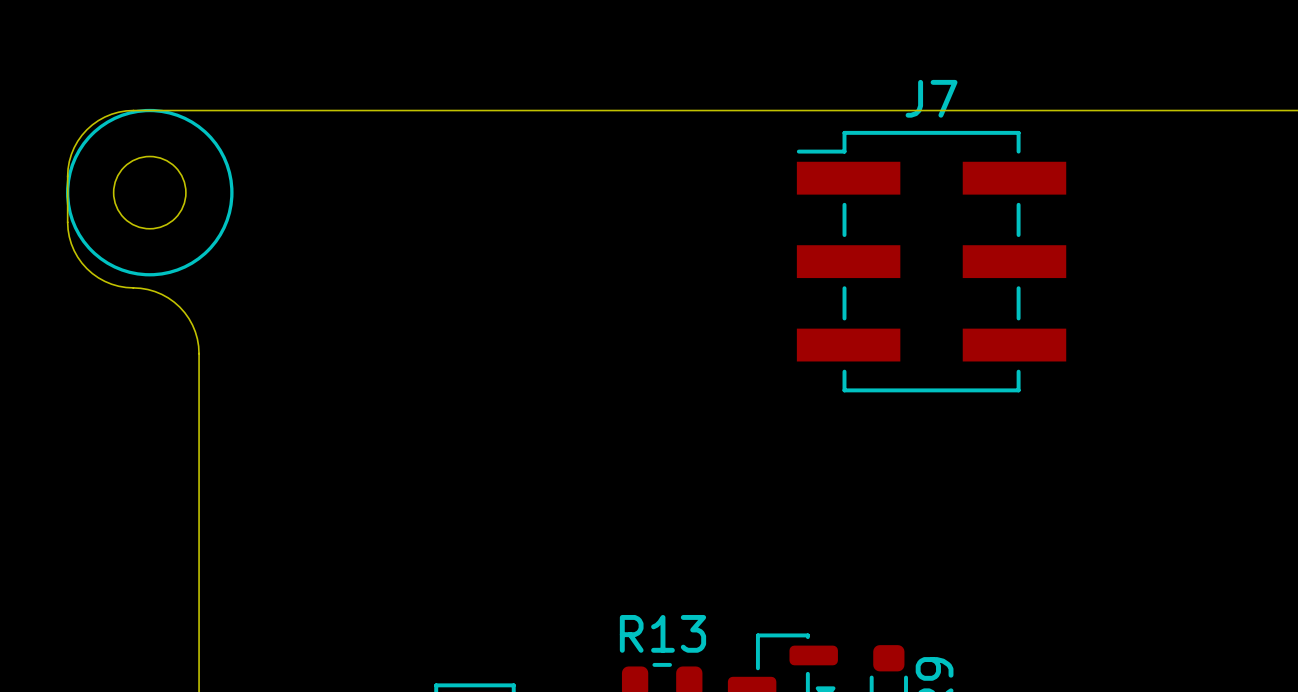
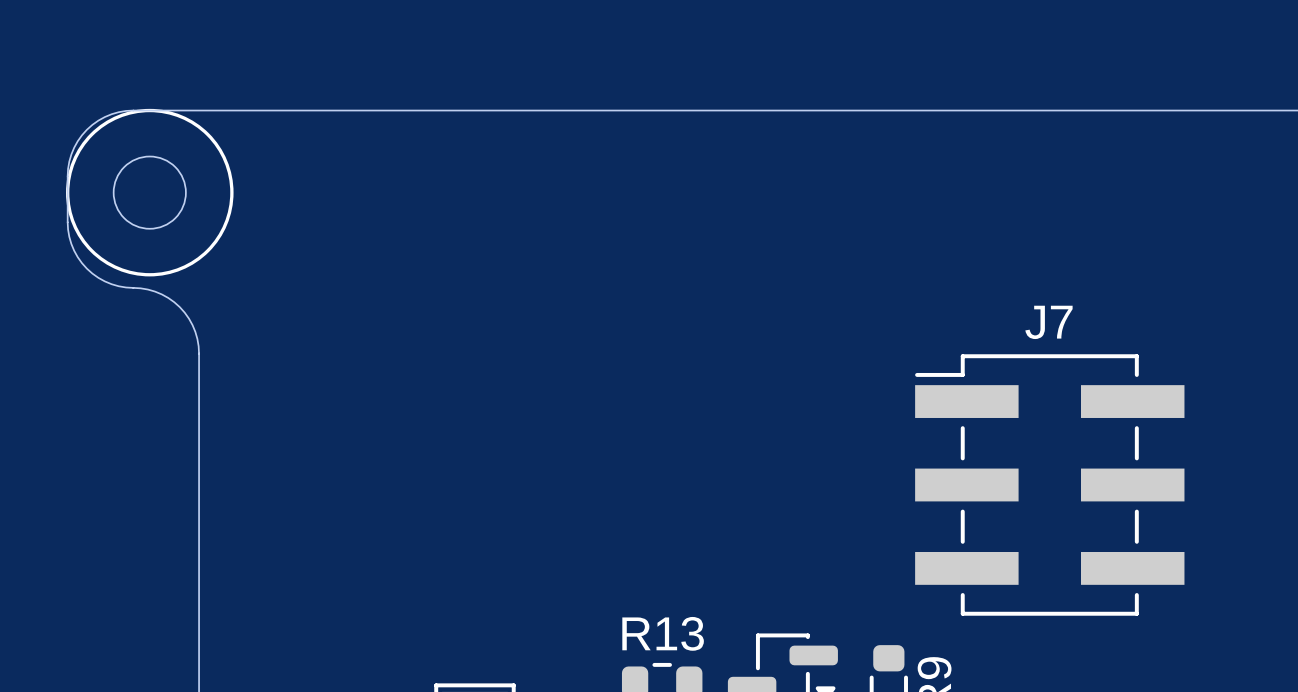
J7 position: (931, 261) -> (1049, 484)

